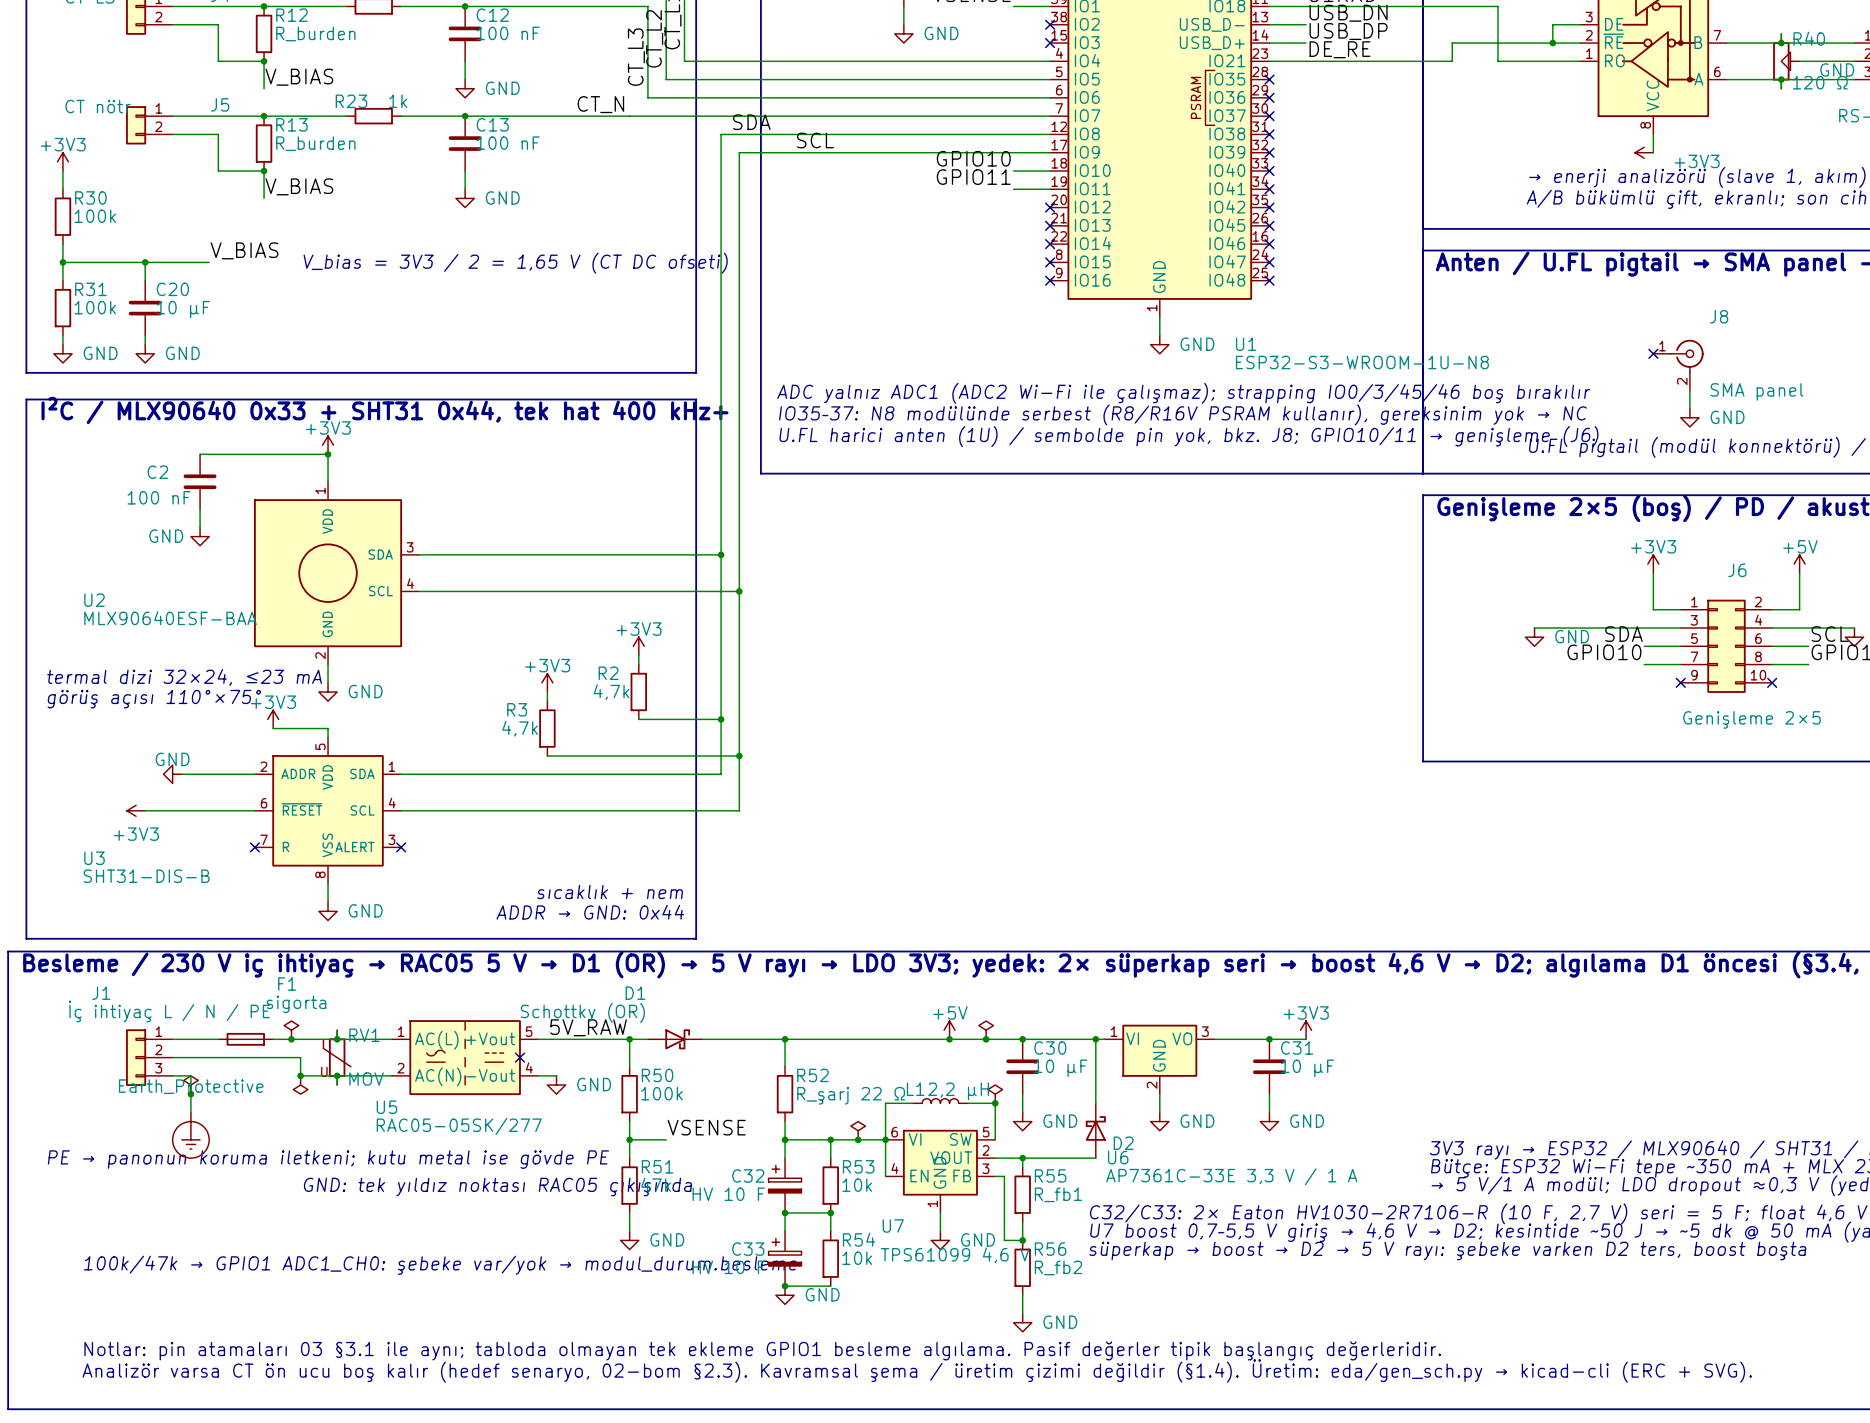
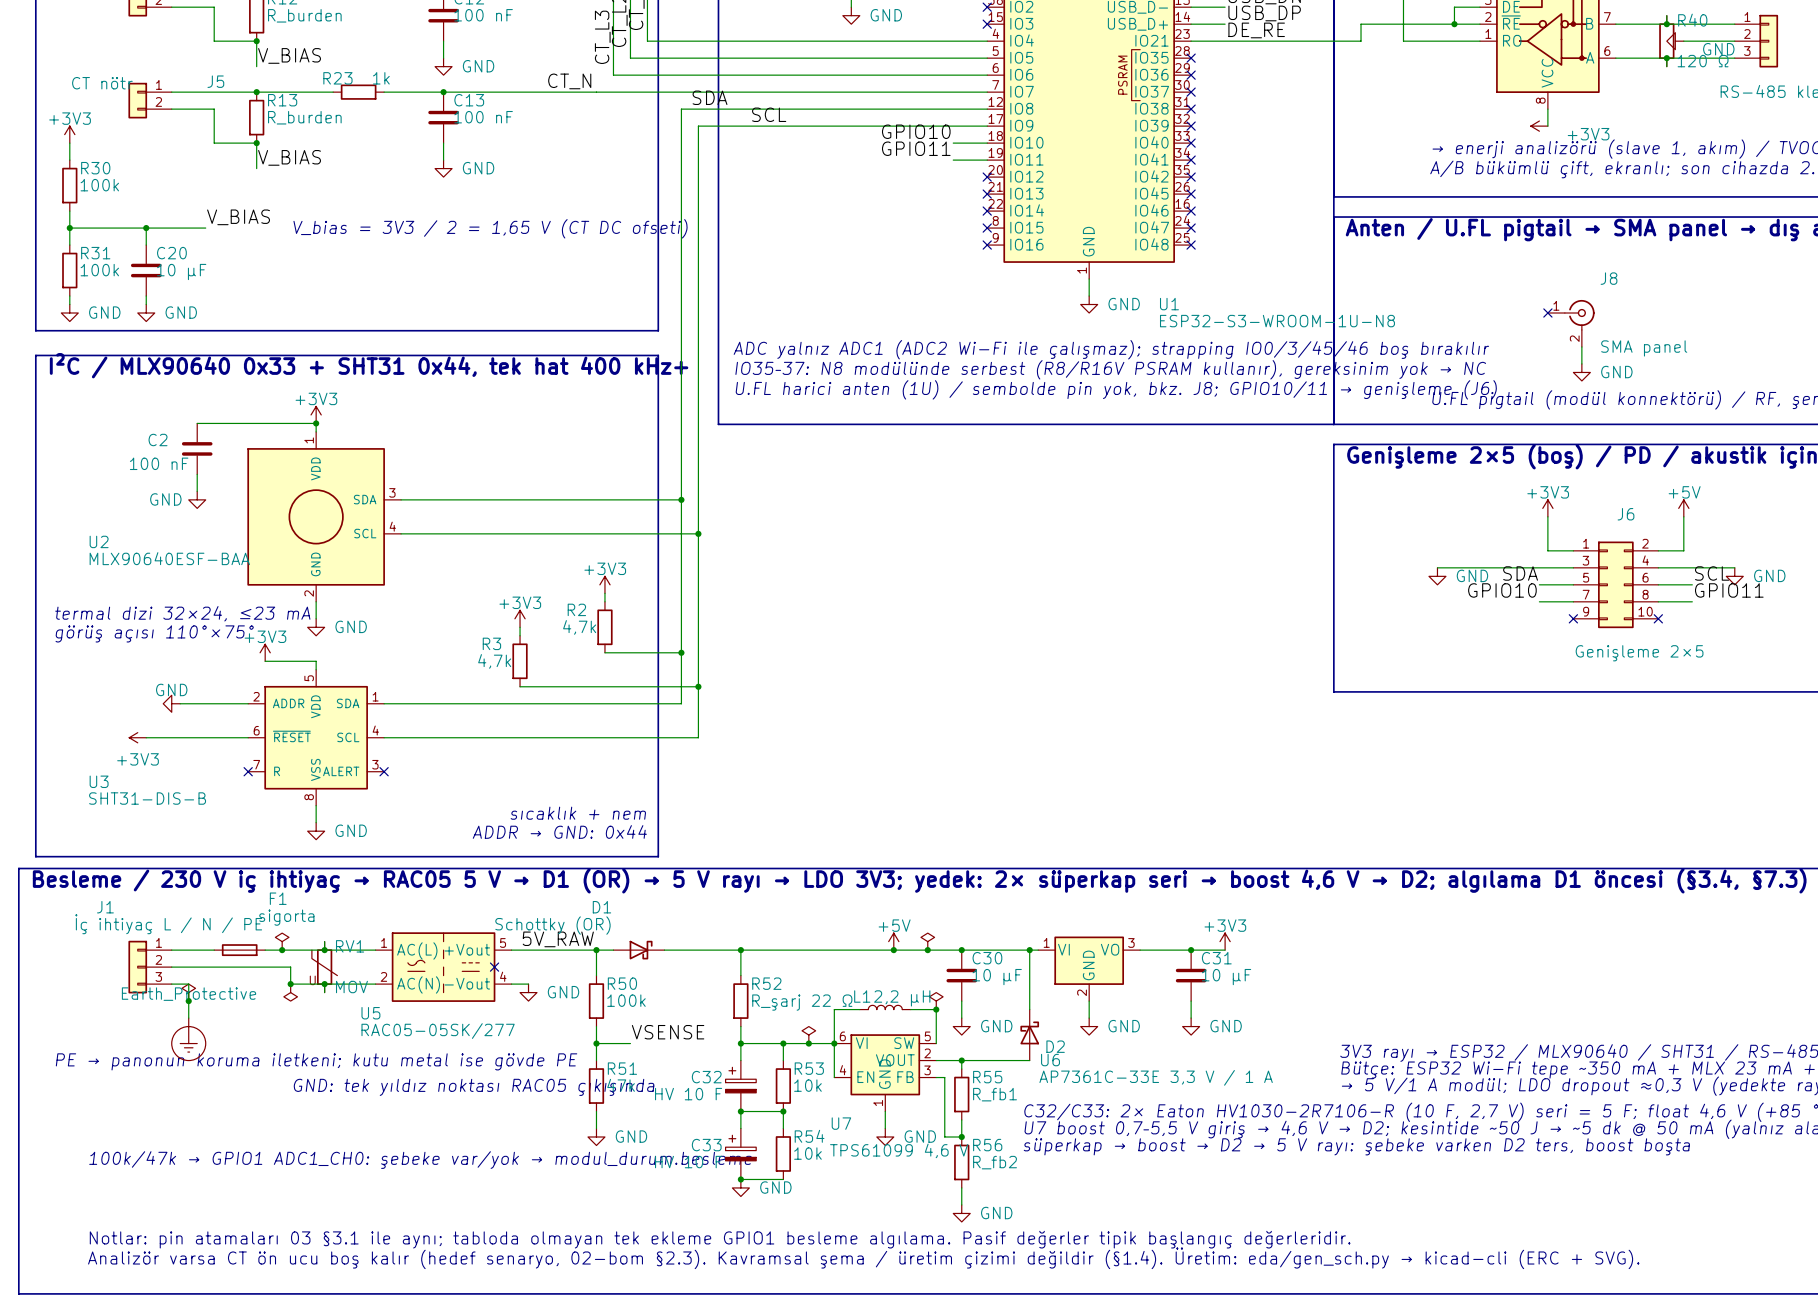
power symbol position: +3V3 (328, 445) -> +3V3 (316, 414)
wire: (200, 454) (328, 454) (328, 472) -> (197, 423) (316, 423)
junction position: (328, 454) -> (316, 423)
C2 position: (200, 481) -> (197, 448)
power symbol position: GND (200, 536) -> GND (197, 499)

